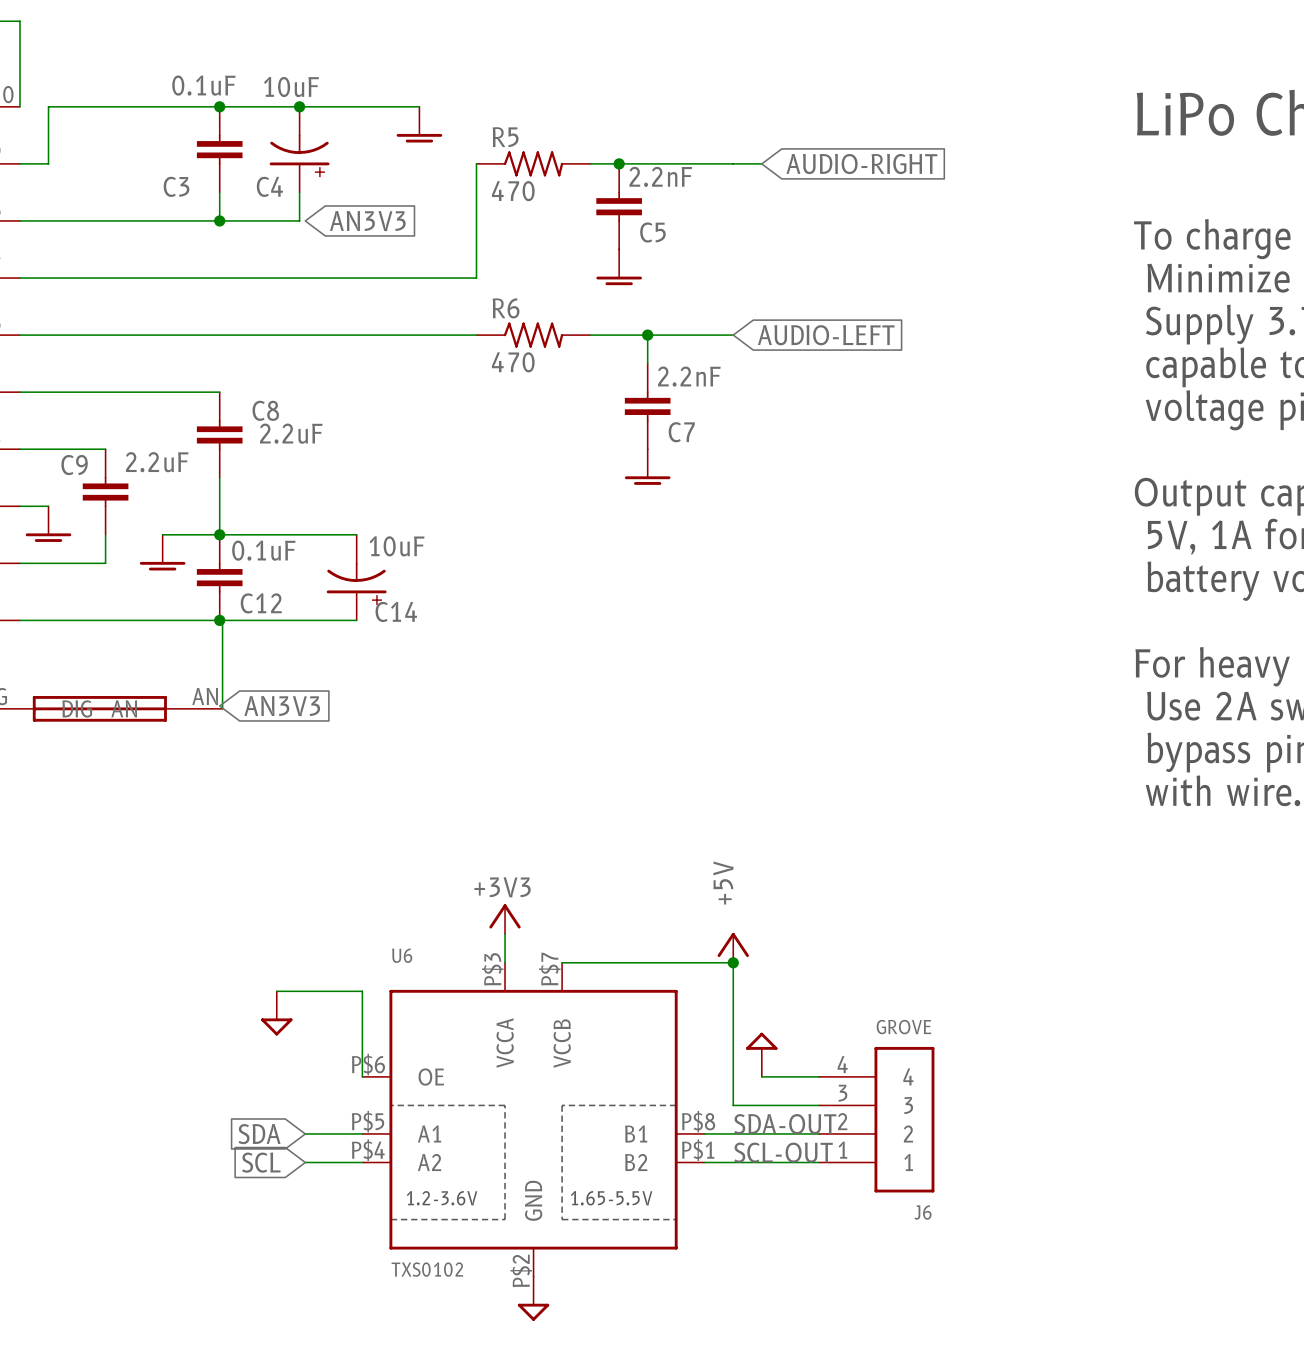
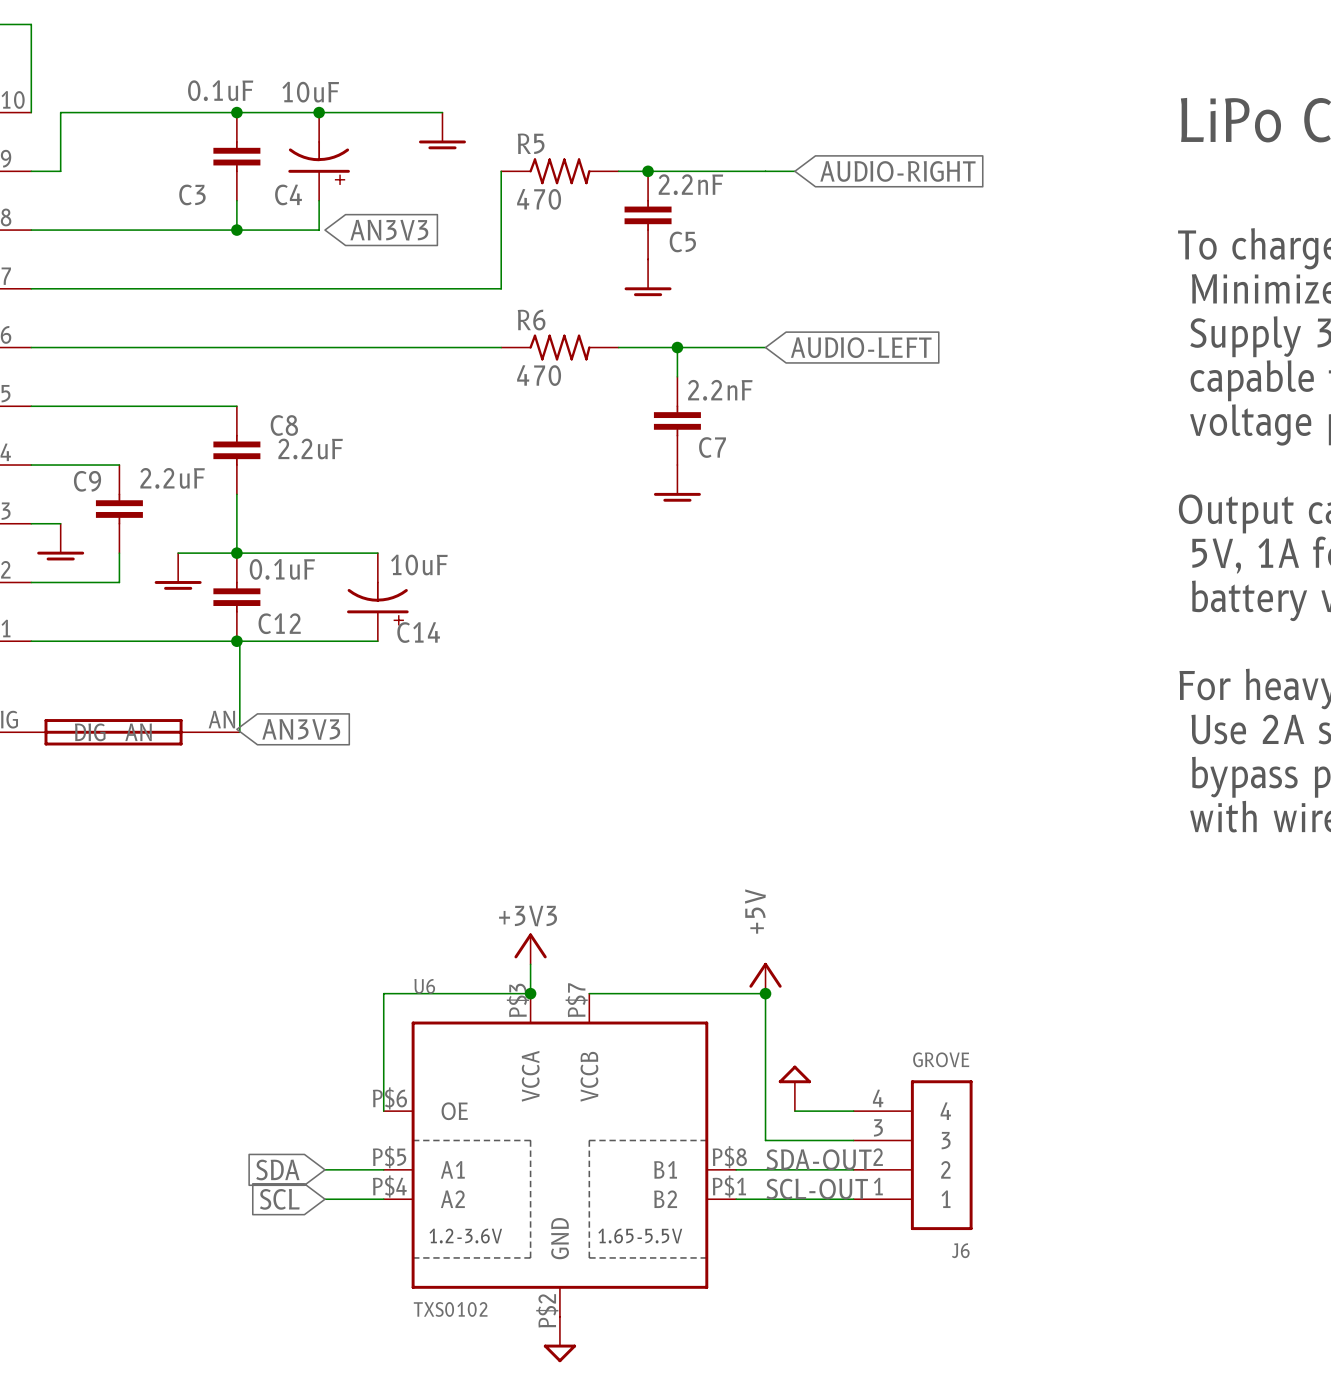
junction: none -> (530, 993)
wire: (276, 991) (362, 991) -> (530, 993) (383, 993) (383, 1023)
power symbol: (276, 1013) -> none

